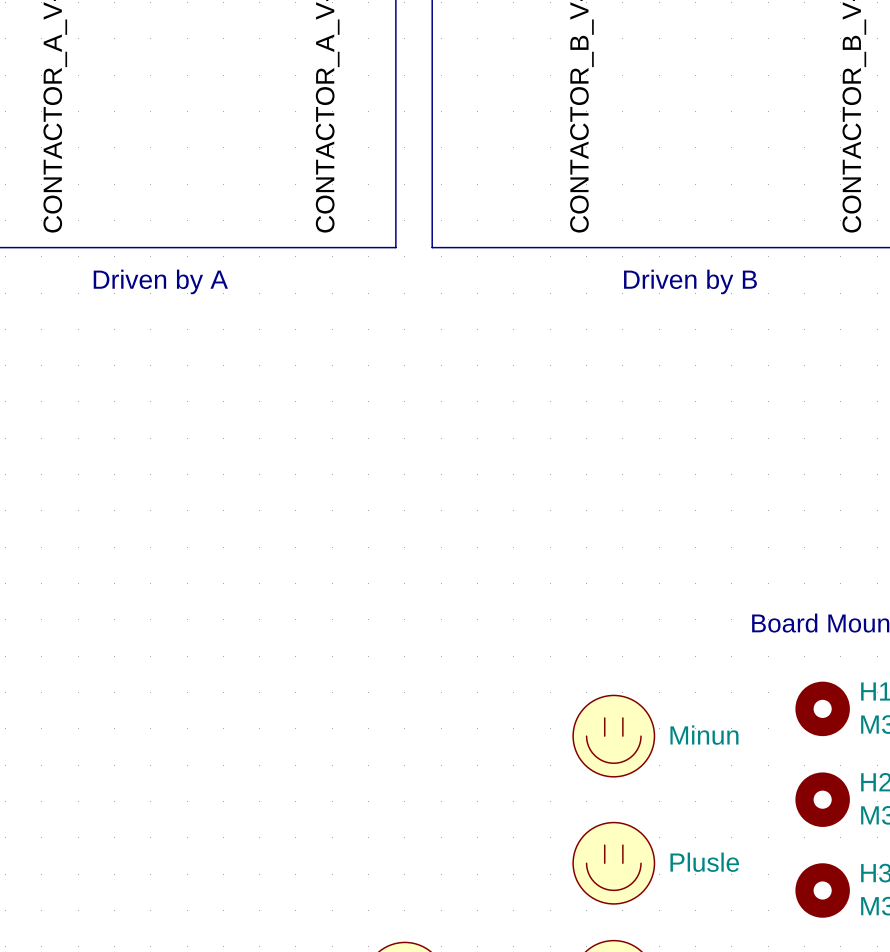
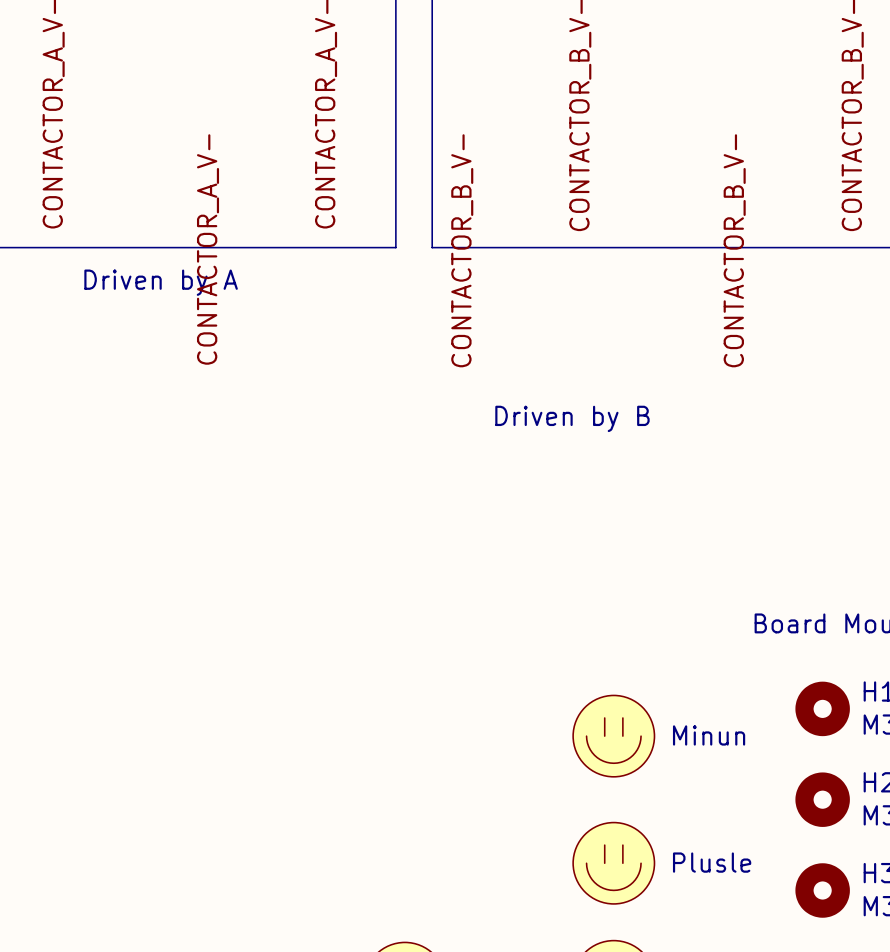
label: none -> CONTACTOR_A_V- (208, 249)
label: none -> CONTACTOR_B_V- (462, 250)
label: none -> CONTACTOR_B_V- (734, 250)
text position: Driven by B (690, 281) -> Driven by B (572, 418)

